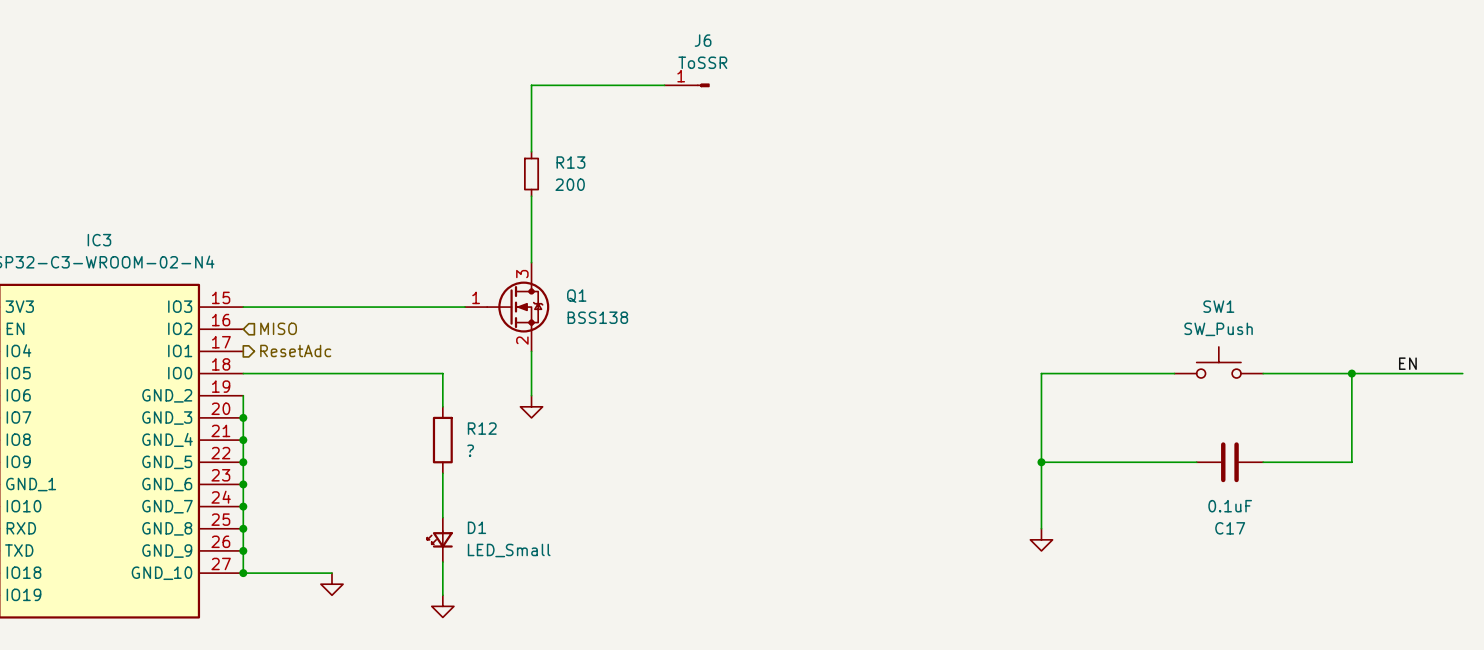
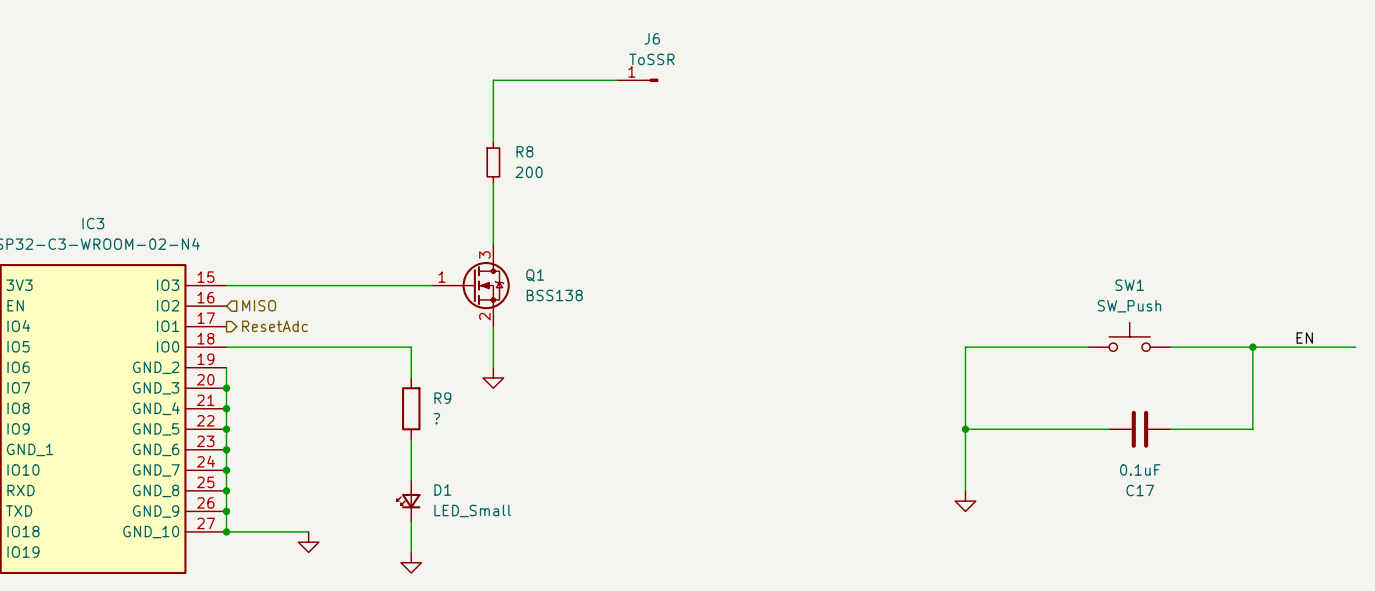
R13 name: R13 (570, 162) -> R8 (524, 151)
R12 name: R12 (482, 428) -> R9 (442, 398)

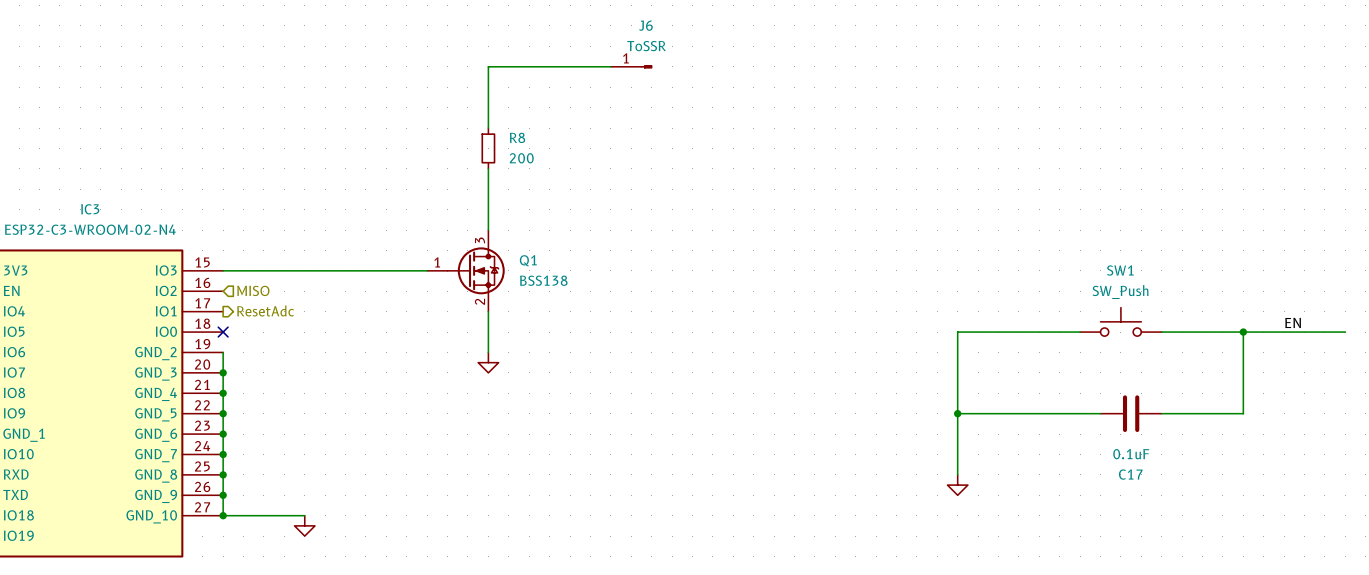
wire: (226, 347) (411, 347) (411, 377) -> none
no-connect mark: none -> (223, 332)
R9: ? (411, 408) -> none
wire: (411, 439) (411, 480) -> none
D1: LED_Small (408, 501) -> none
wire: (411, 521) (411, 552) -> none
power symbol: (411, 562) -> none

